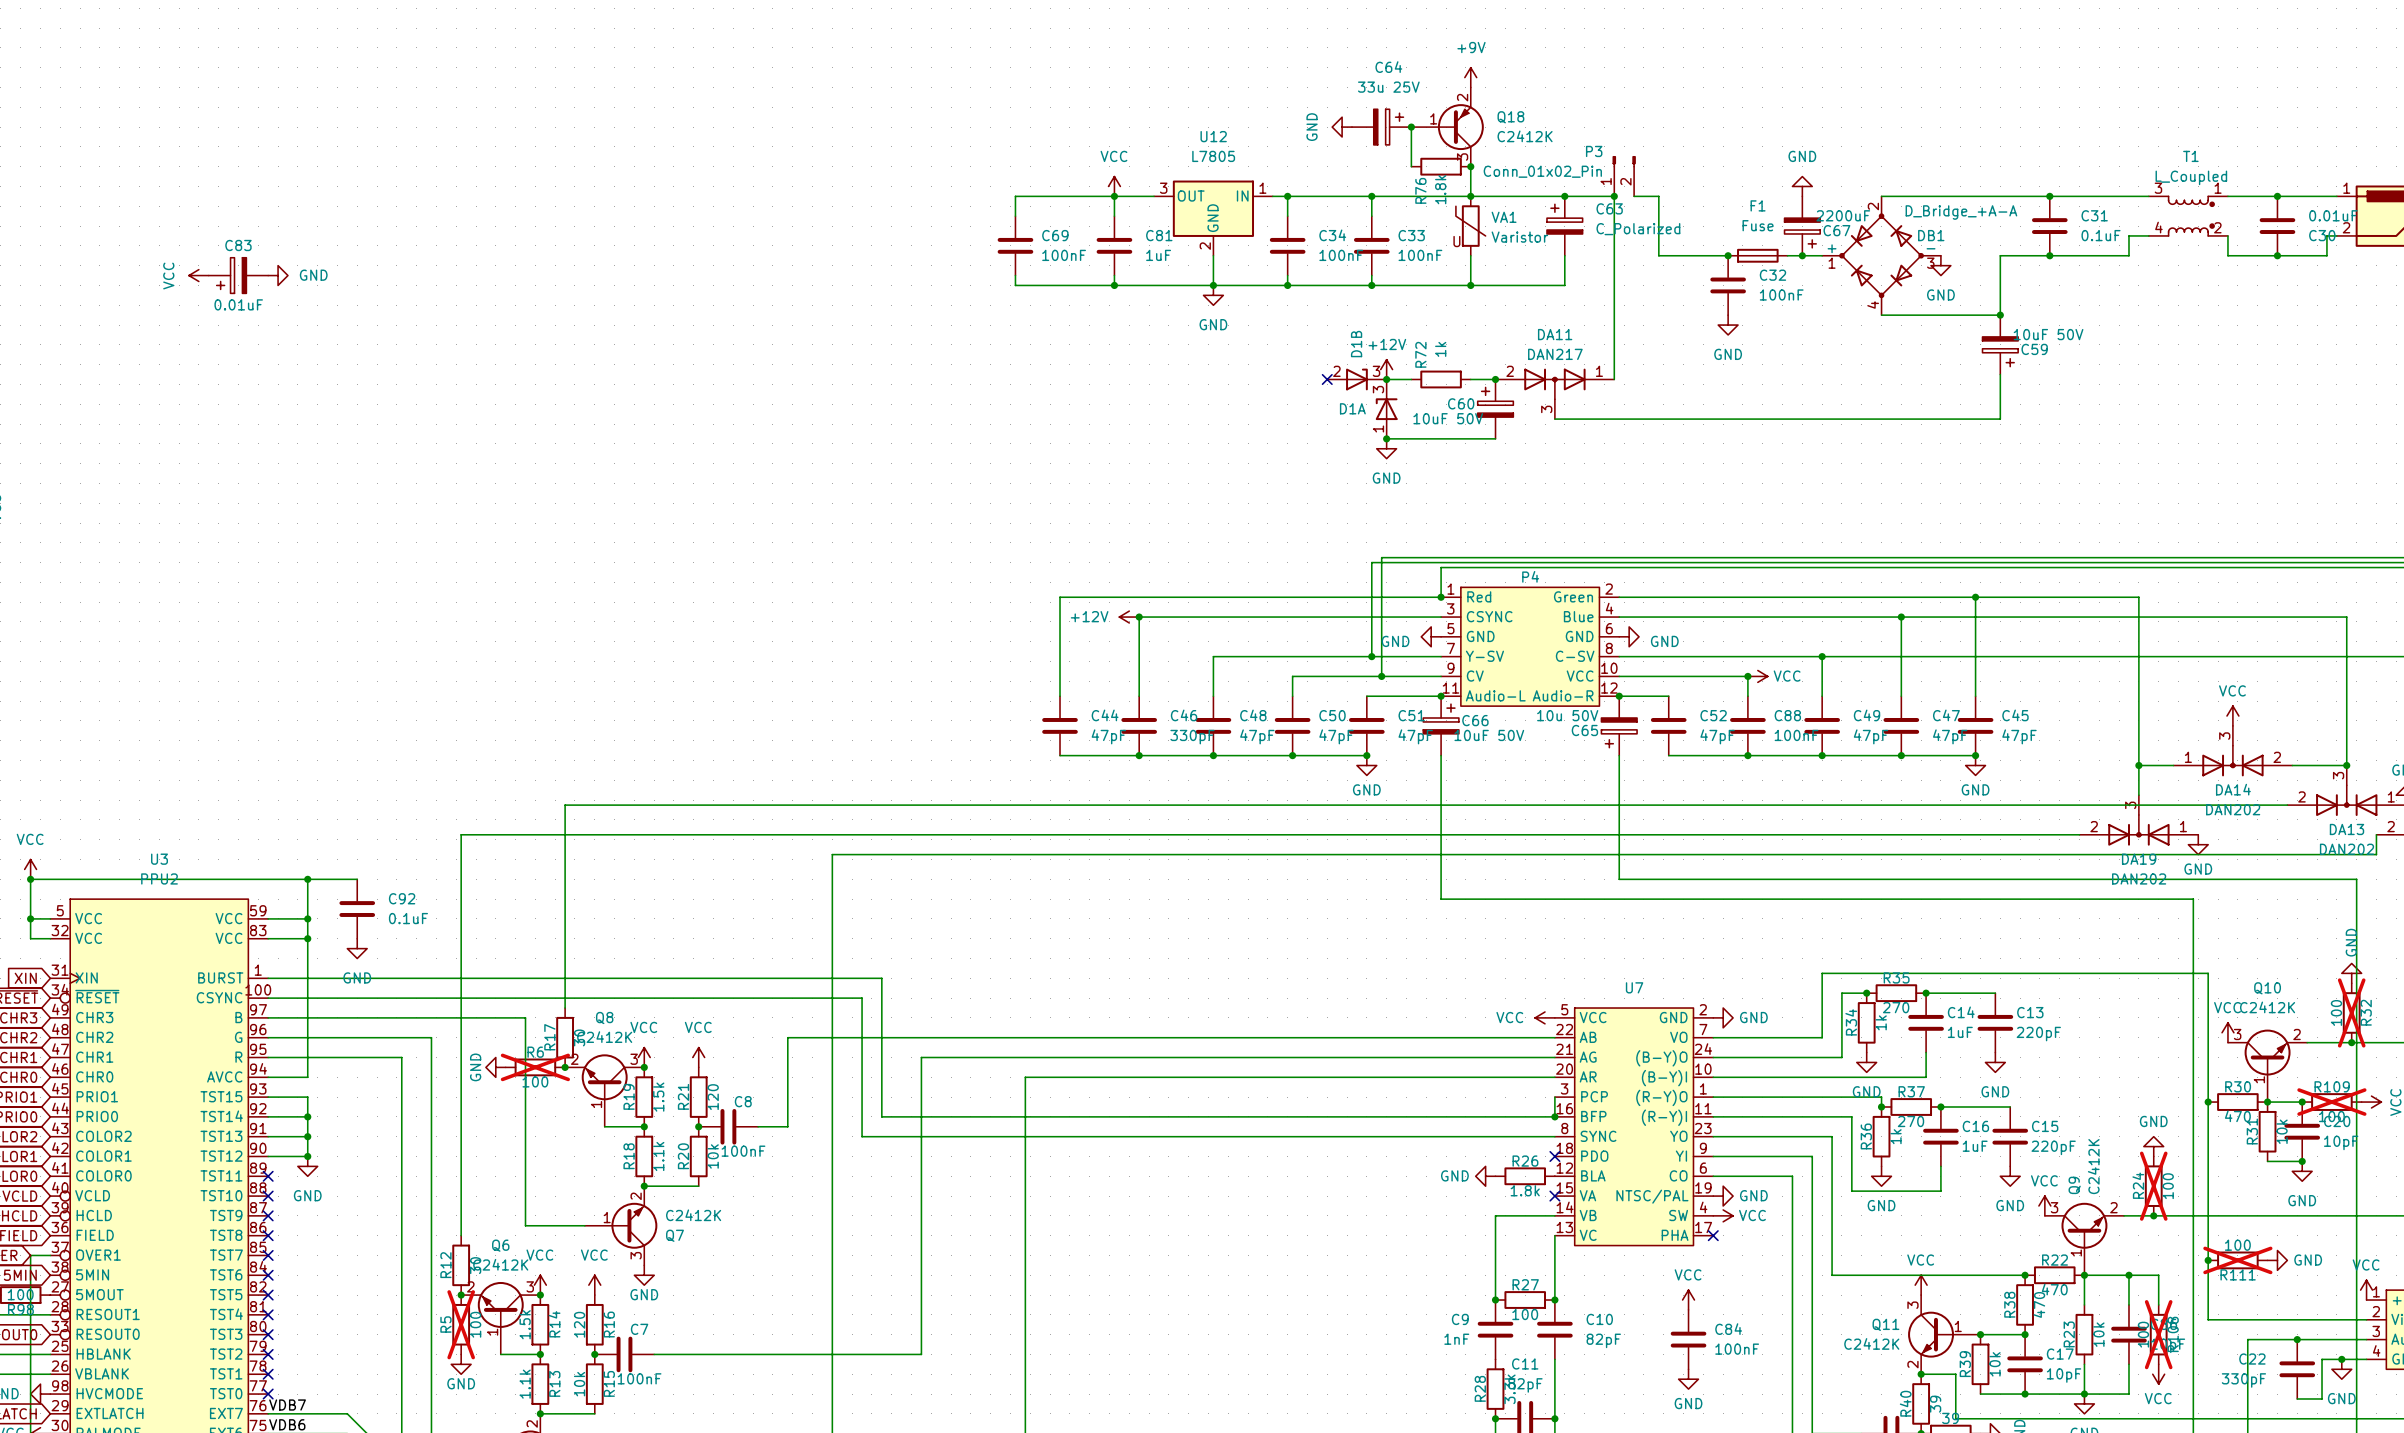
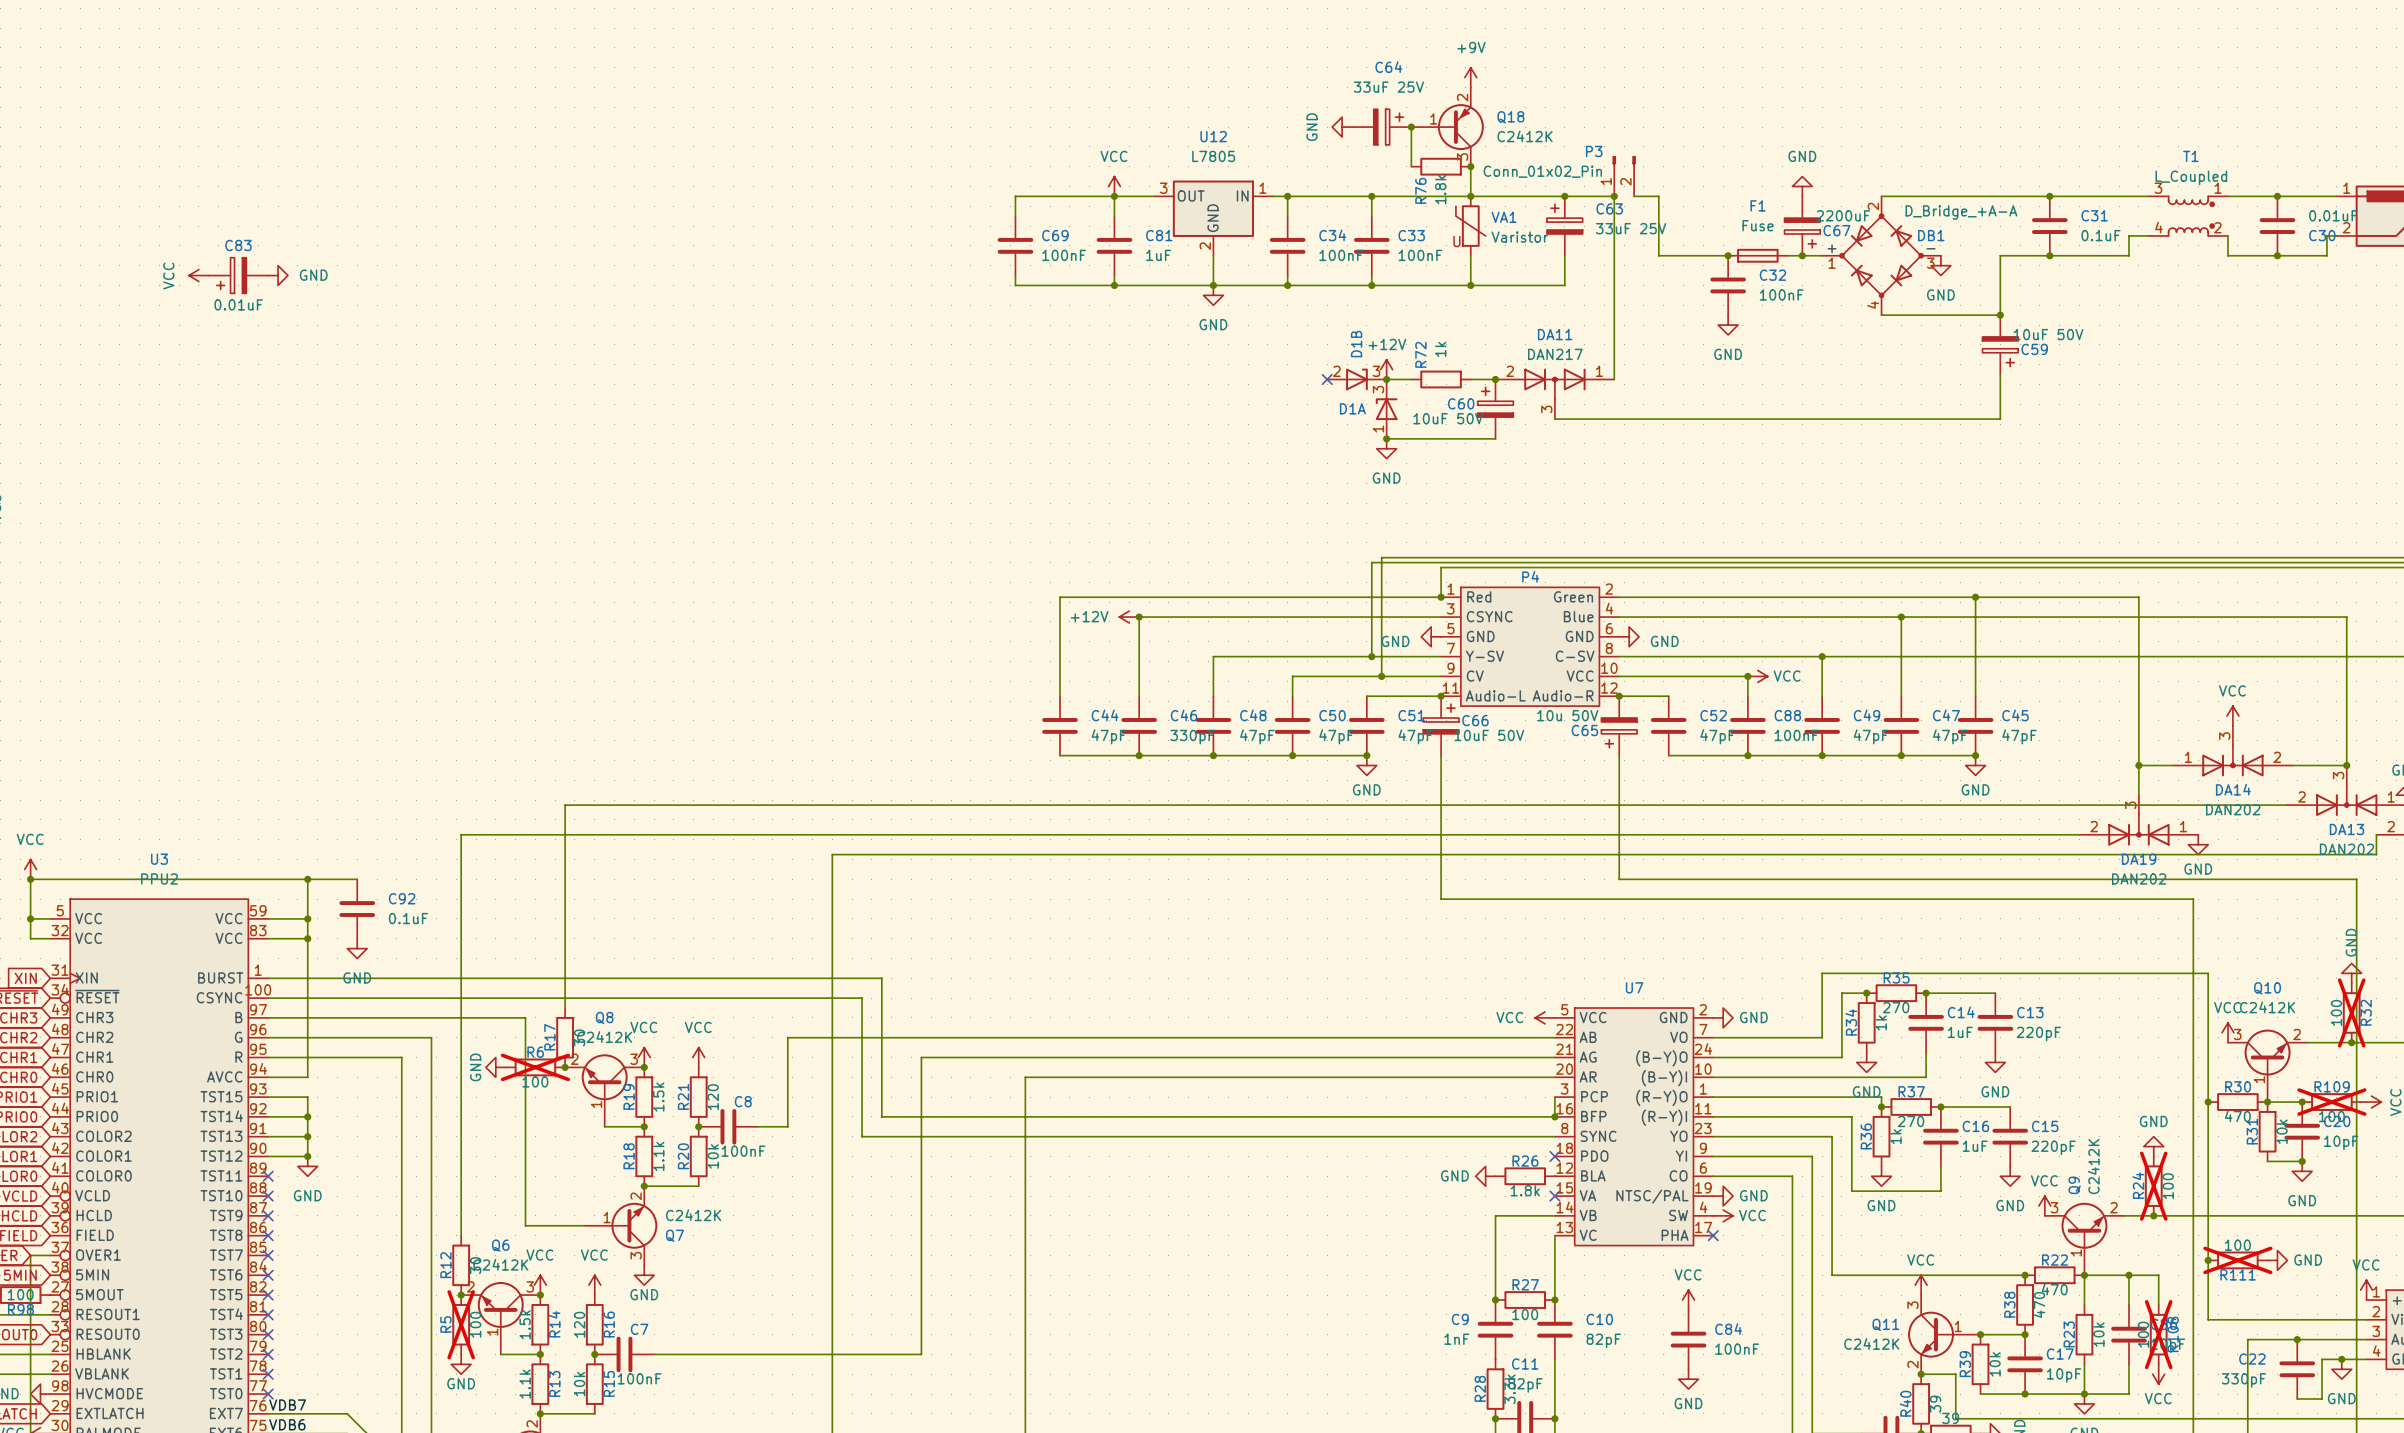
C64 value: 33u 25V (1388, 87) -> 33uF 25V (1388, 87)
C63 value: C_Polarized (1638, 229) -> 33uF 25V (1631, 228)

